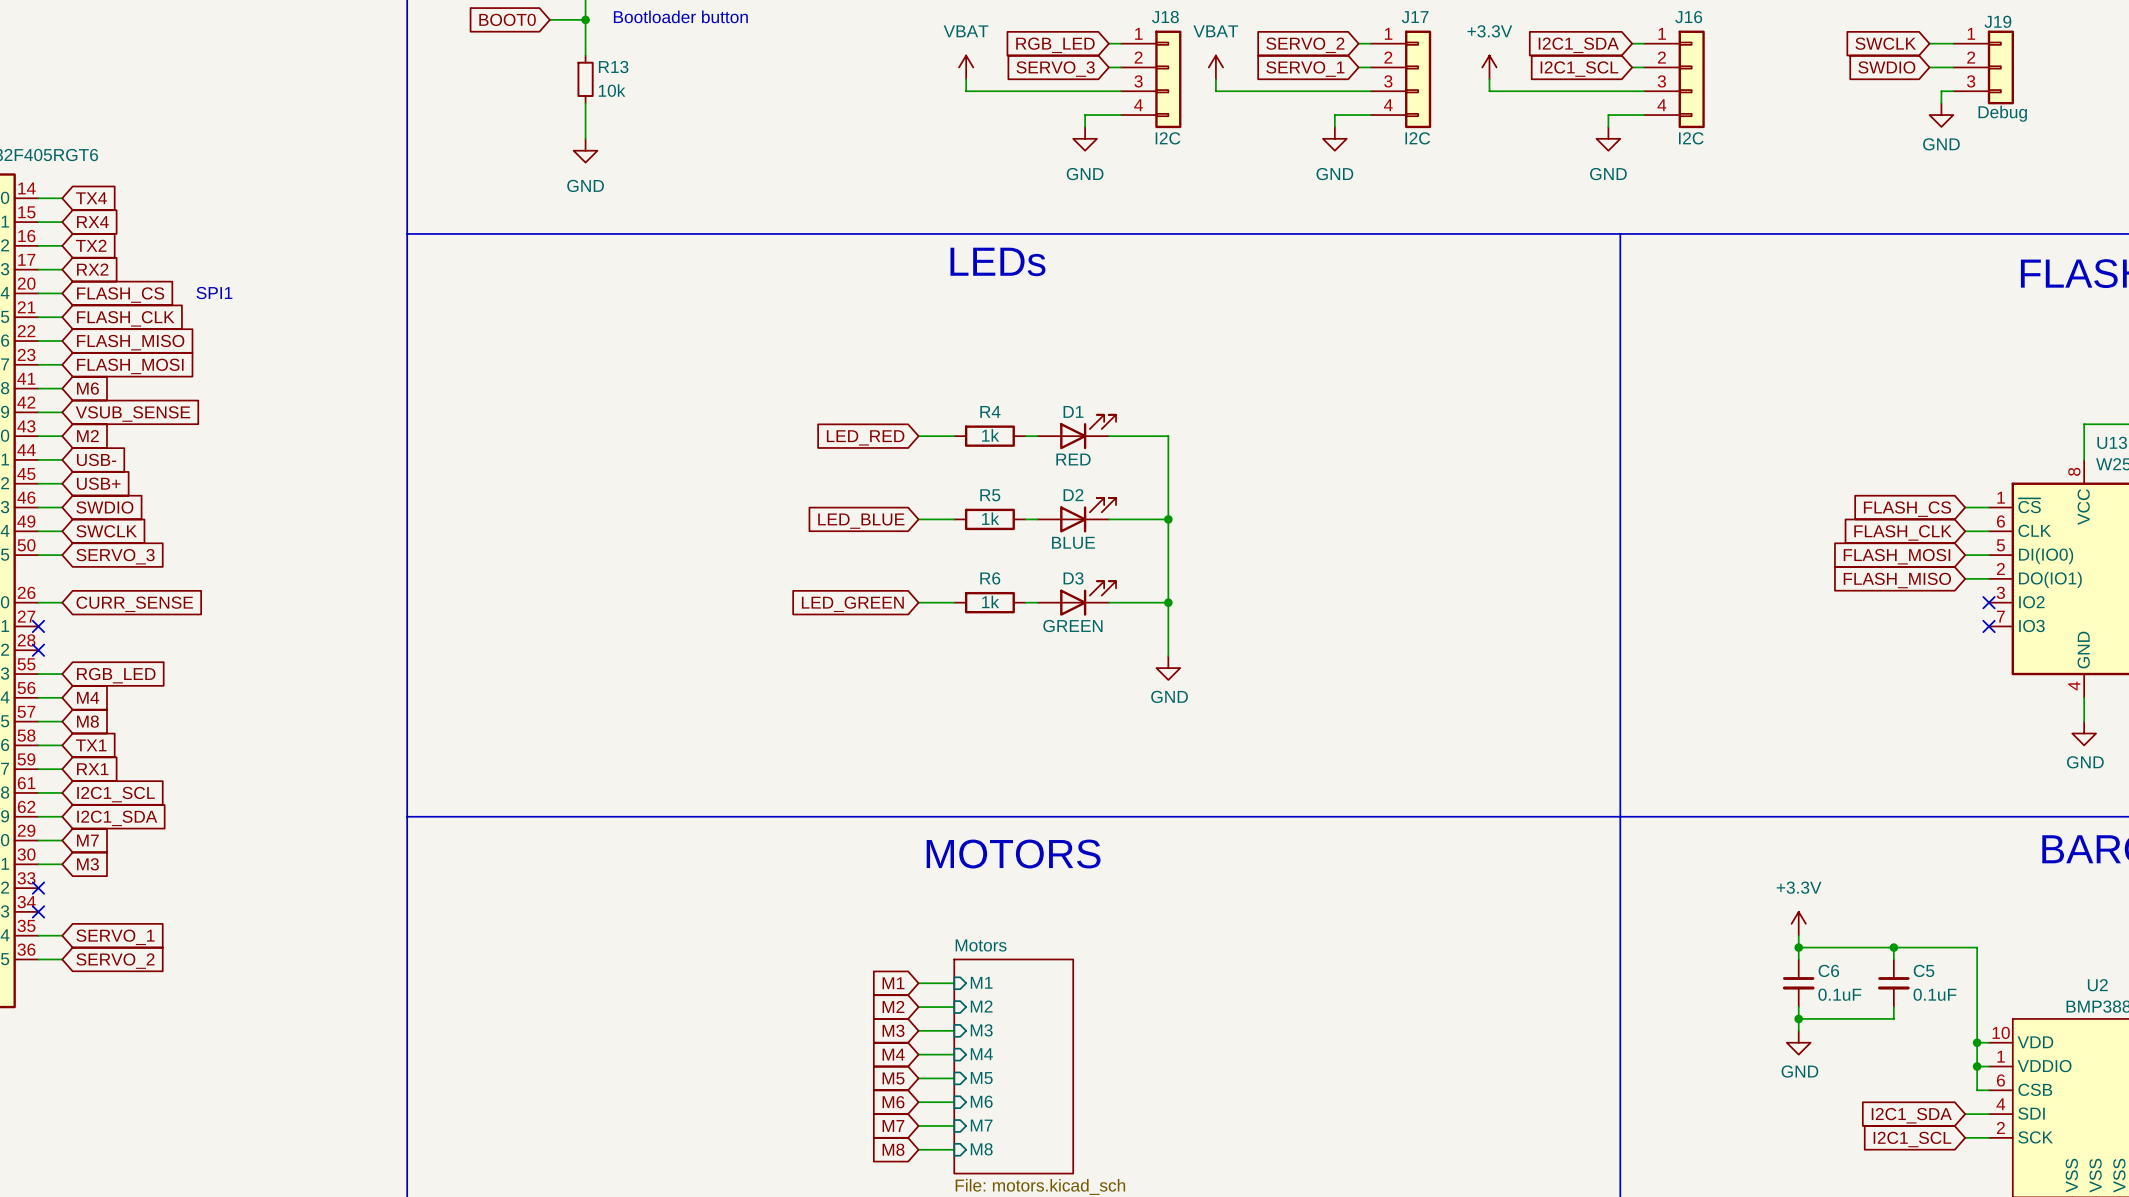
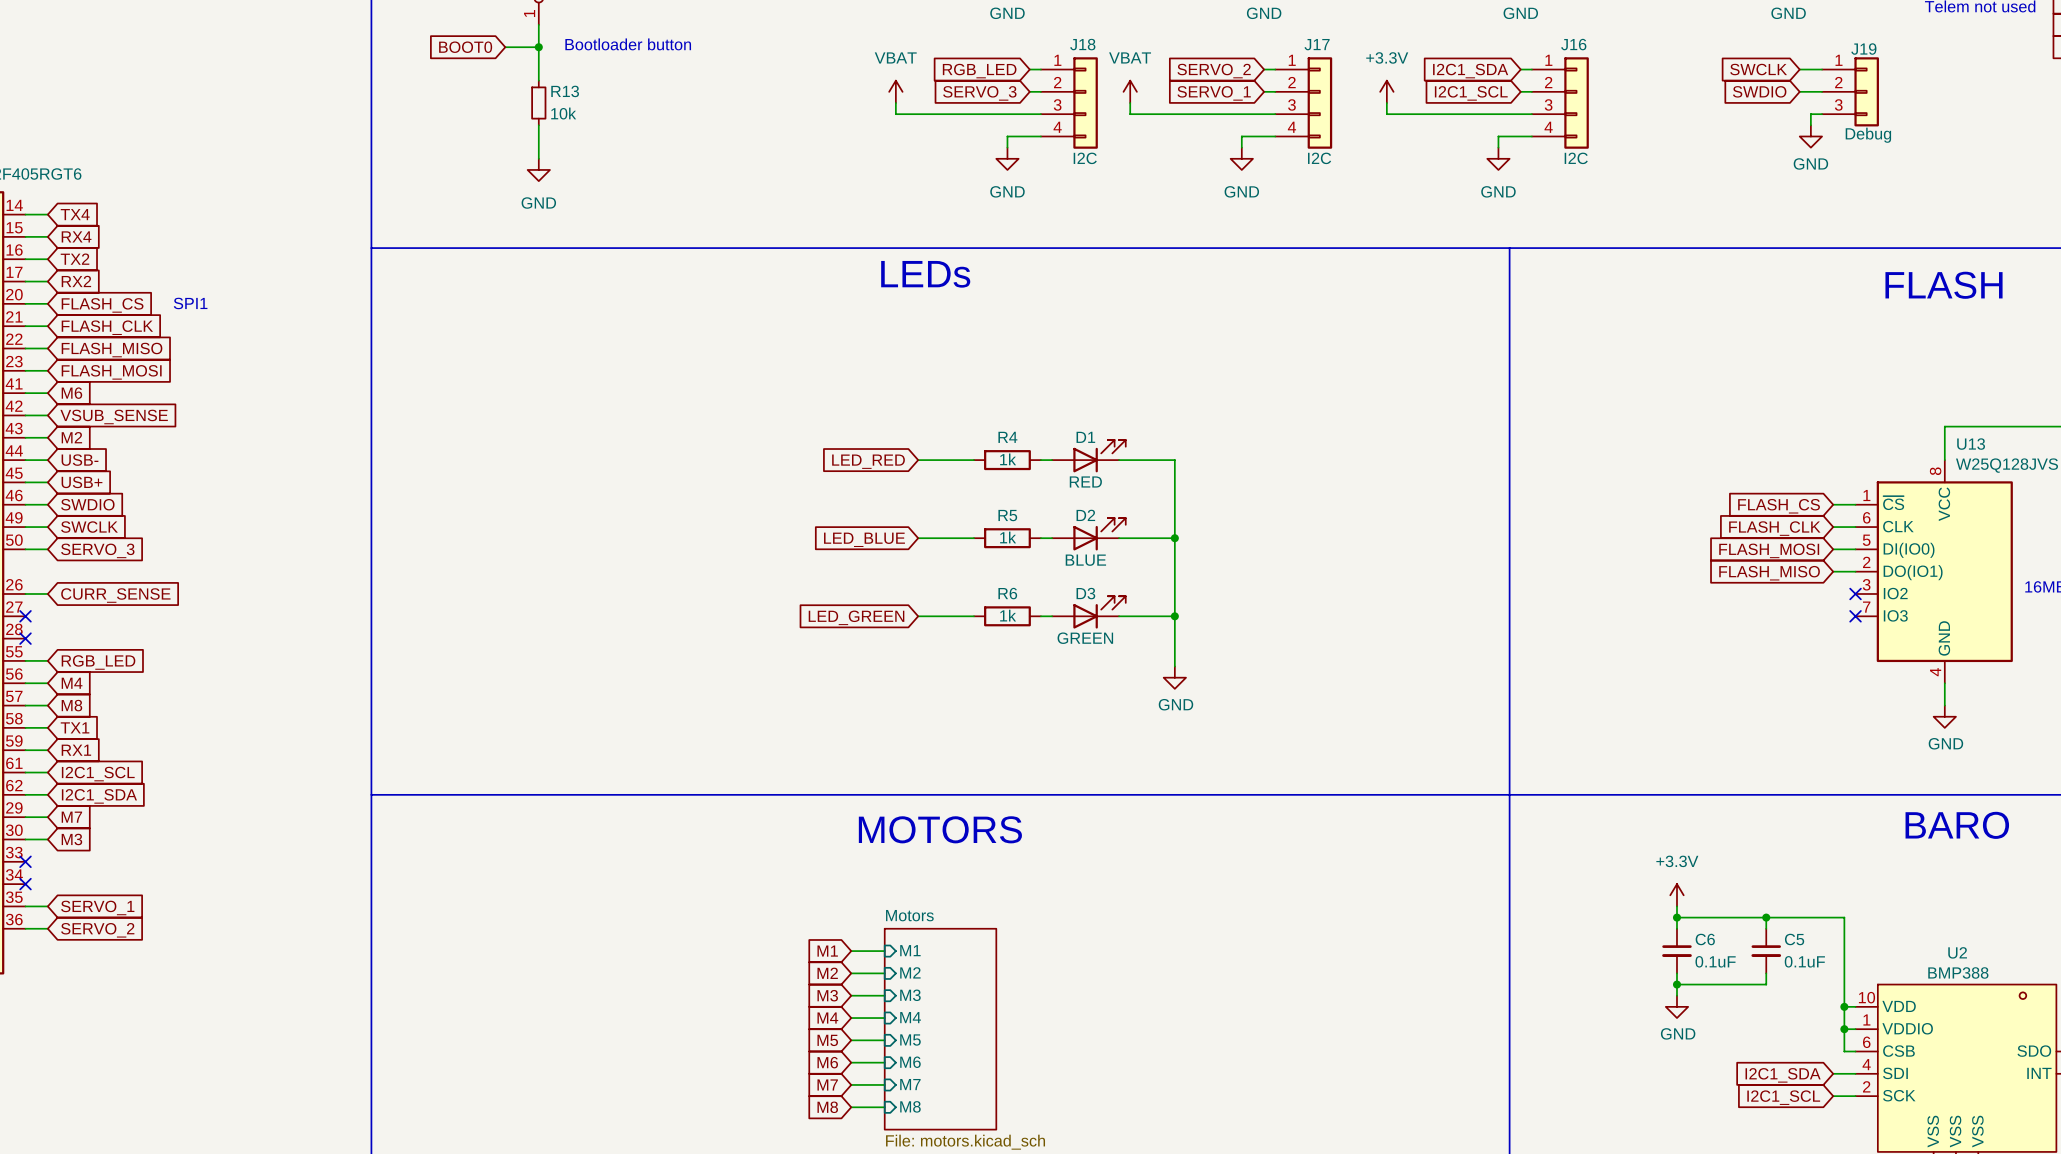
D1 position: (1076, 432) -> (1088, 456)
wire: (918, 436) (954, 436) -> none
R4 position: (989, 436) -> (1007, 460)
wire: (1025, 436) (1037, 436) -> (1040, 460) (1052, 460)
wire: (1108, 436) (1168, 436) (1168, 656) -> (1119, 460) (1174, 460) (1174, 666)
global label position: LED_RED (865, 437) -> LED_RED (868, 461)
wire: none -> (918, 460) (973, 460)
D2 position: (1076, 515) -> (1088, 534)
wire: (918, 519) (954, 519) -> none
R5 position: (989, 519) -> (1007, 538)
wire: (1025, 519) (1037, 519) -> (1040, 538) (1052, 538)
wire: (1108, 519) (1168, 519) -> (1119, 538) (1174, 538)
junction: (1168, 519) -> none
global label position: LED_BLUE (861, 521) -> LED_BLUE (864, 539)
wire: none -> (918, 538) (973, 538)
junction: none -> (1174, 538)
D3 position: (1076, 598) -> (1088, 612)
wire: (918, 602) (954, 602) -> none
R6 position: (989, 602) -> (1007, 616)
wire: (1025, 602) (1037, 602) -> (1040, 616) (1052, 616)
wire: (1108, 602) (1168, 602) -> (1119, 616) (1174, 616)
junction: (1168, 602) -> none
global label position: LED_GREEN (852, 604) -> LED_GREEN (856, 617)
wire: none -> (918, 616) (973, 616)
junction: none -> (1174, 616)
power symbol position: GND (1168, 668) -> GND (1174, 677)

